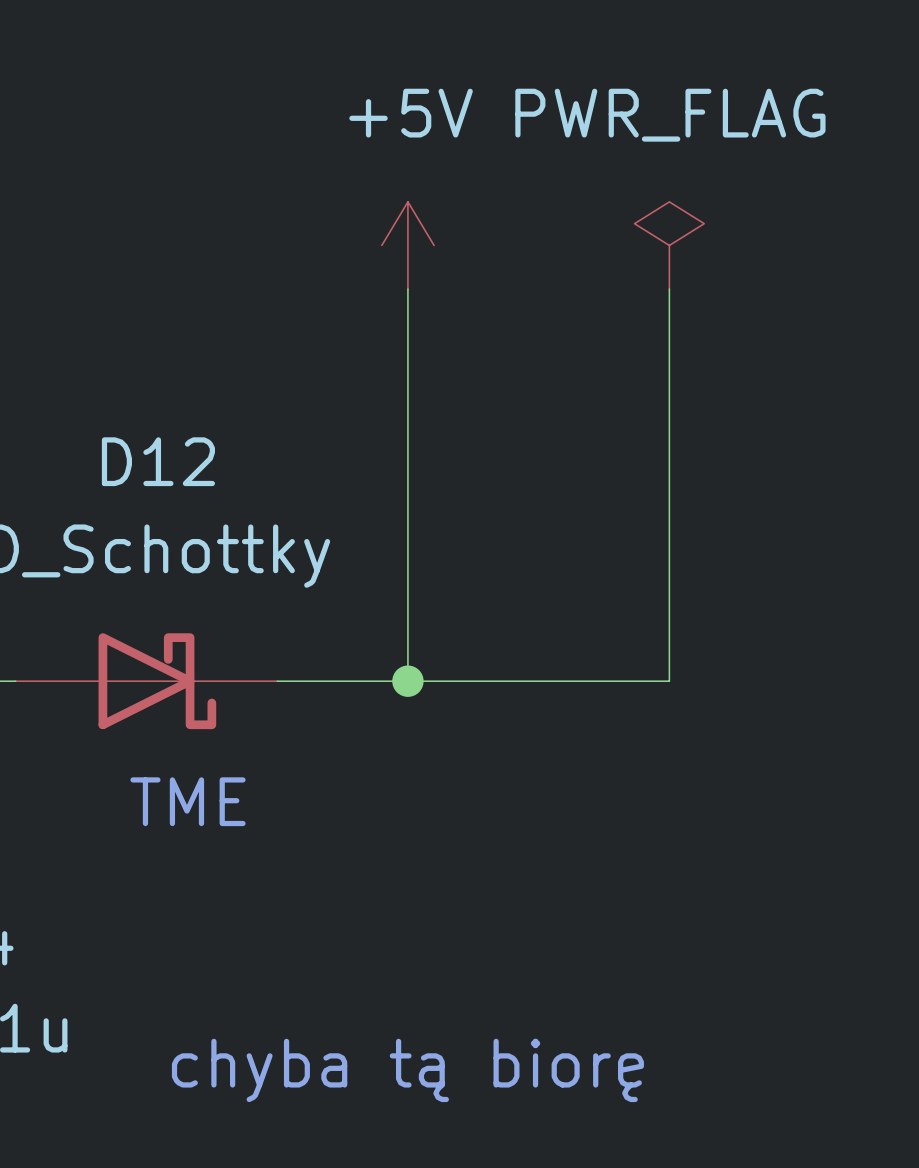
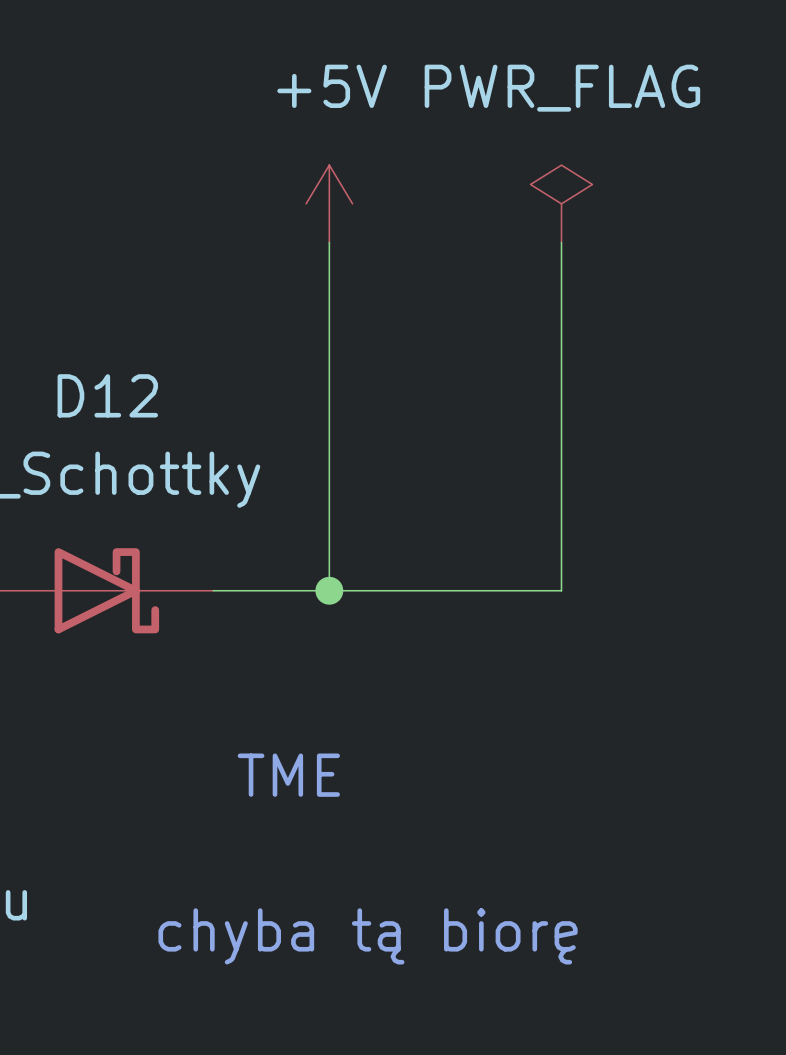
text position: TME (187, 801) -> TME (288, 775)
text position: chyba tą biorę (407, 1070) -> chyba tą biorę (368, 936)

